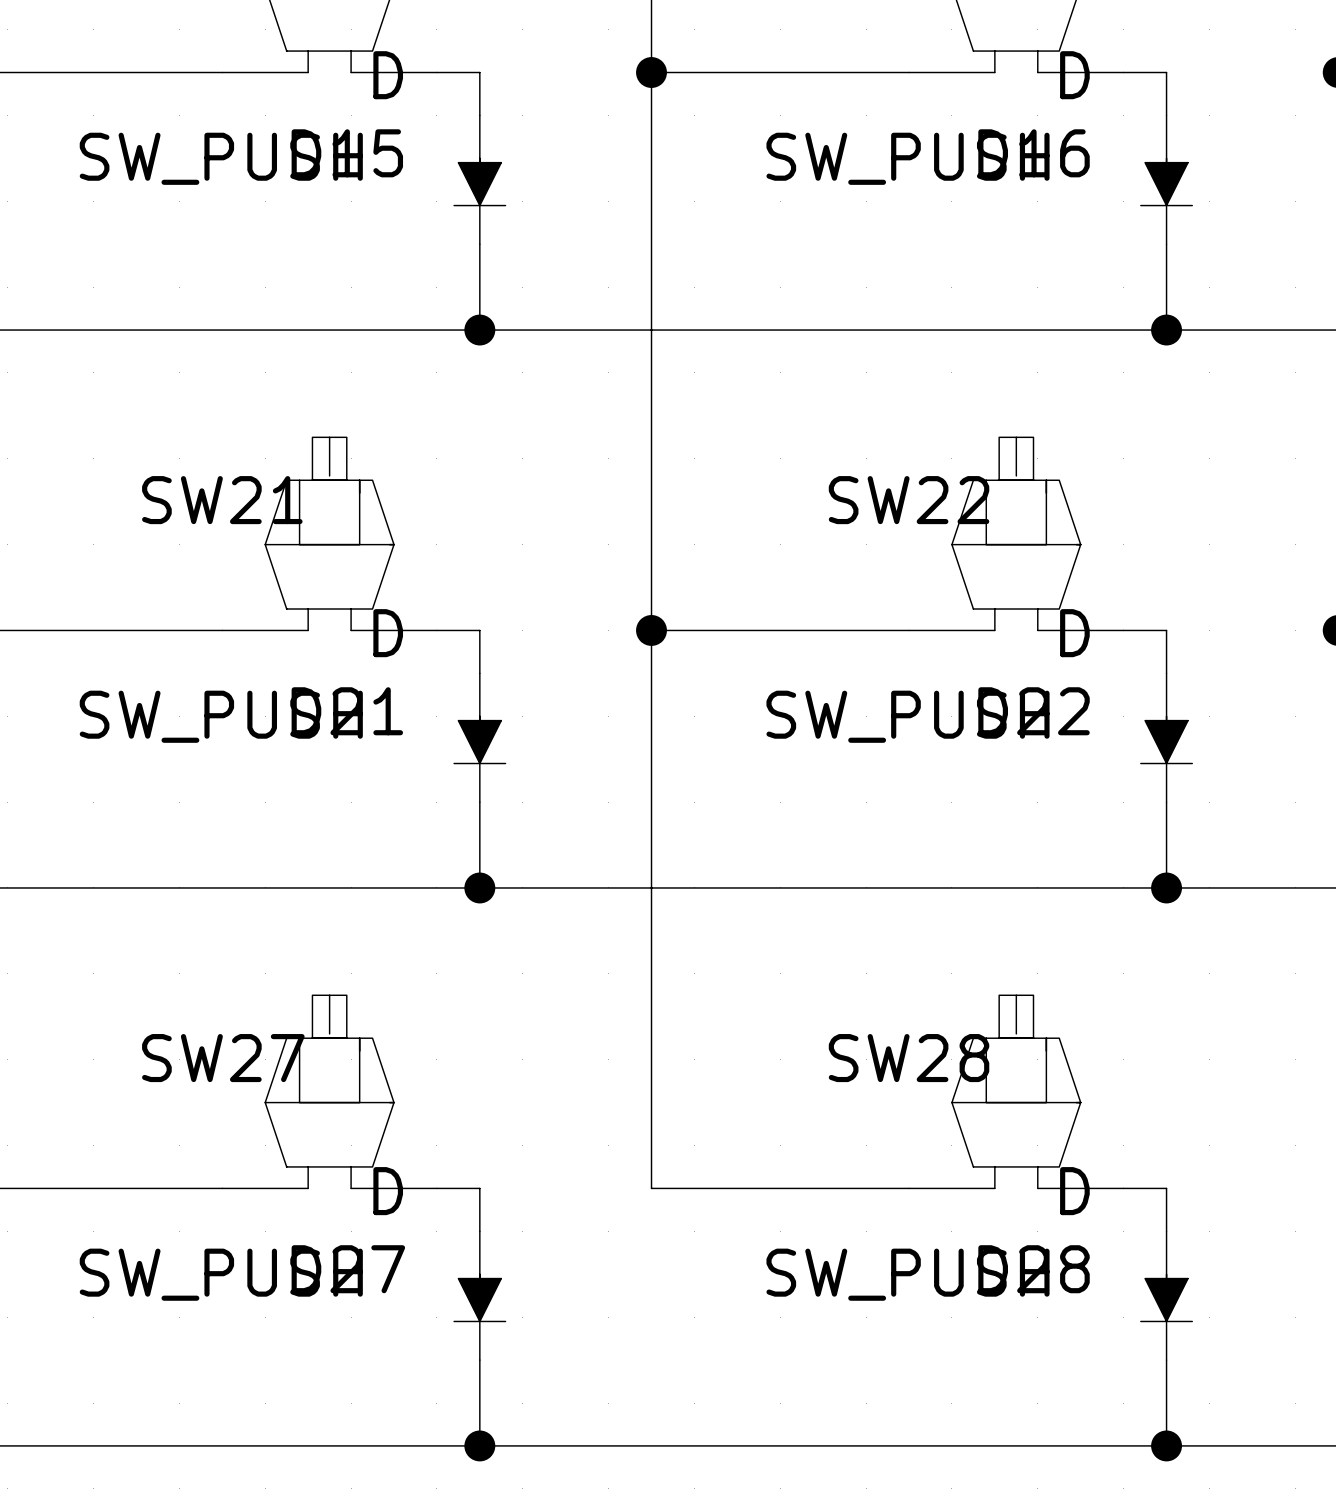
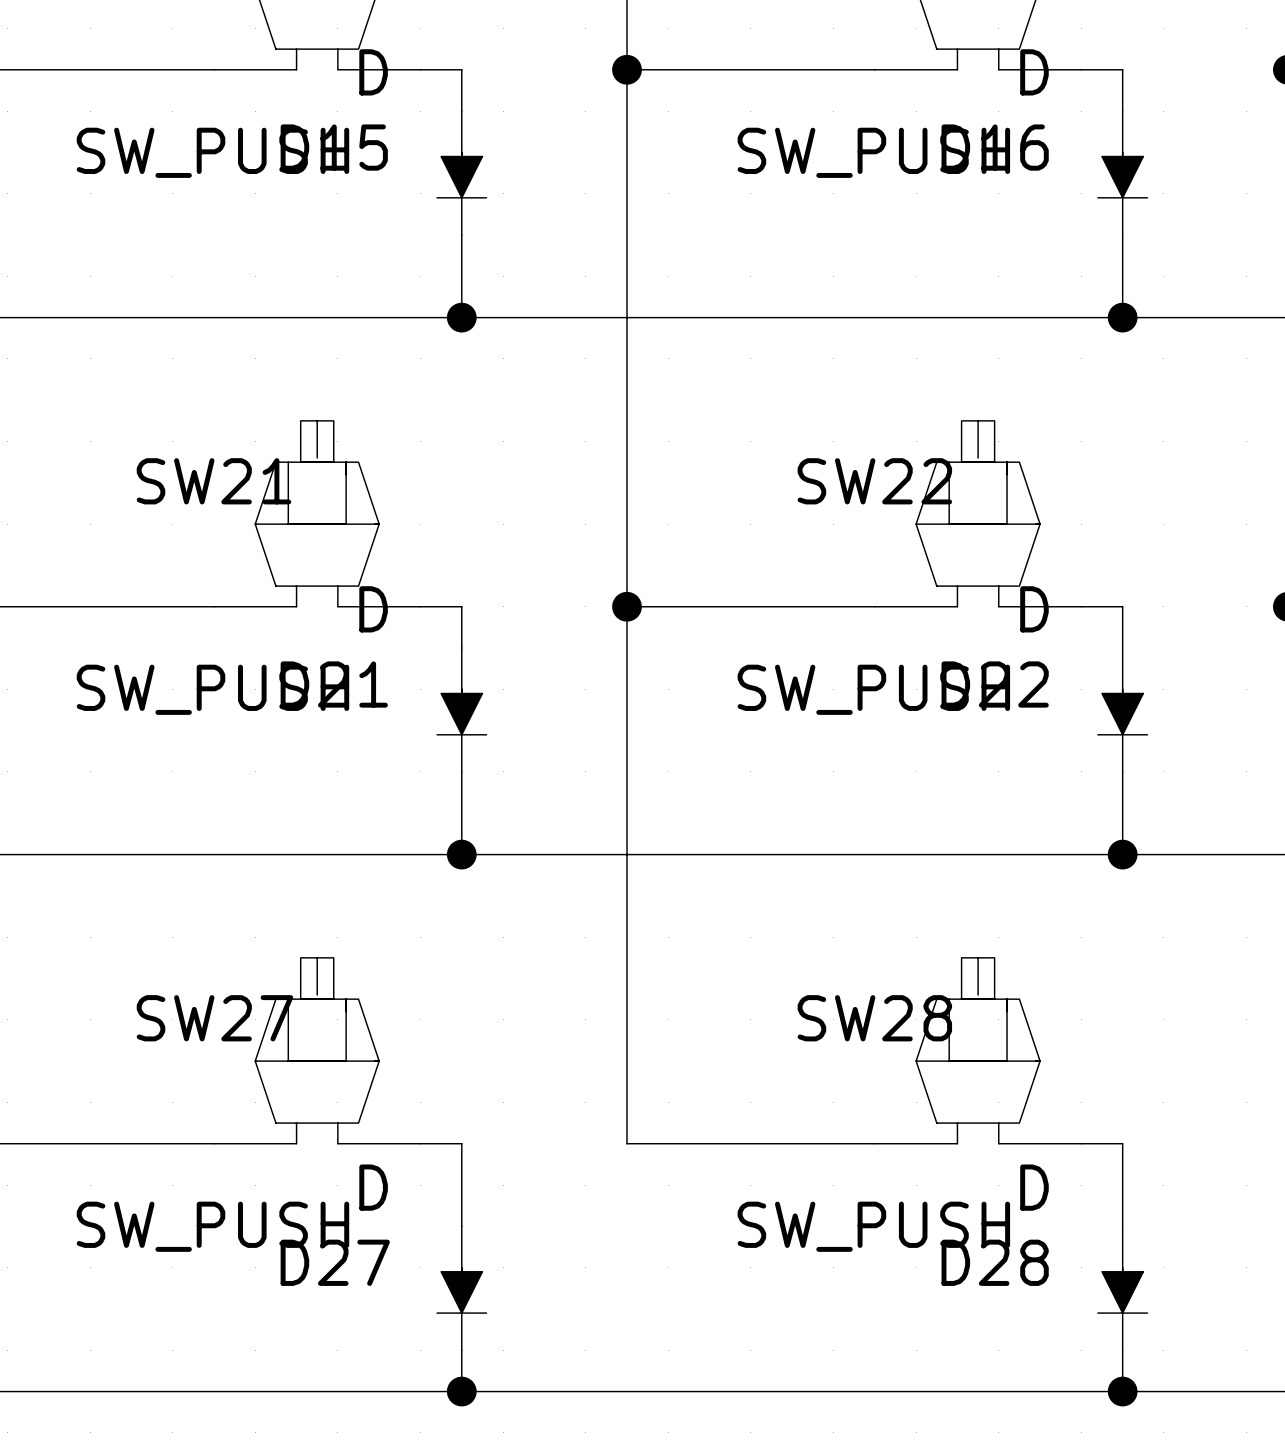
D27 position: (479, 1295) -> (461, 1288)
D28 position: (1166, 1295) -> (1122, 1288)

